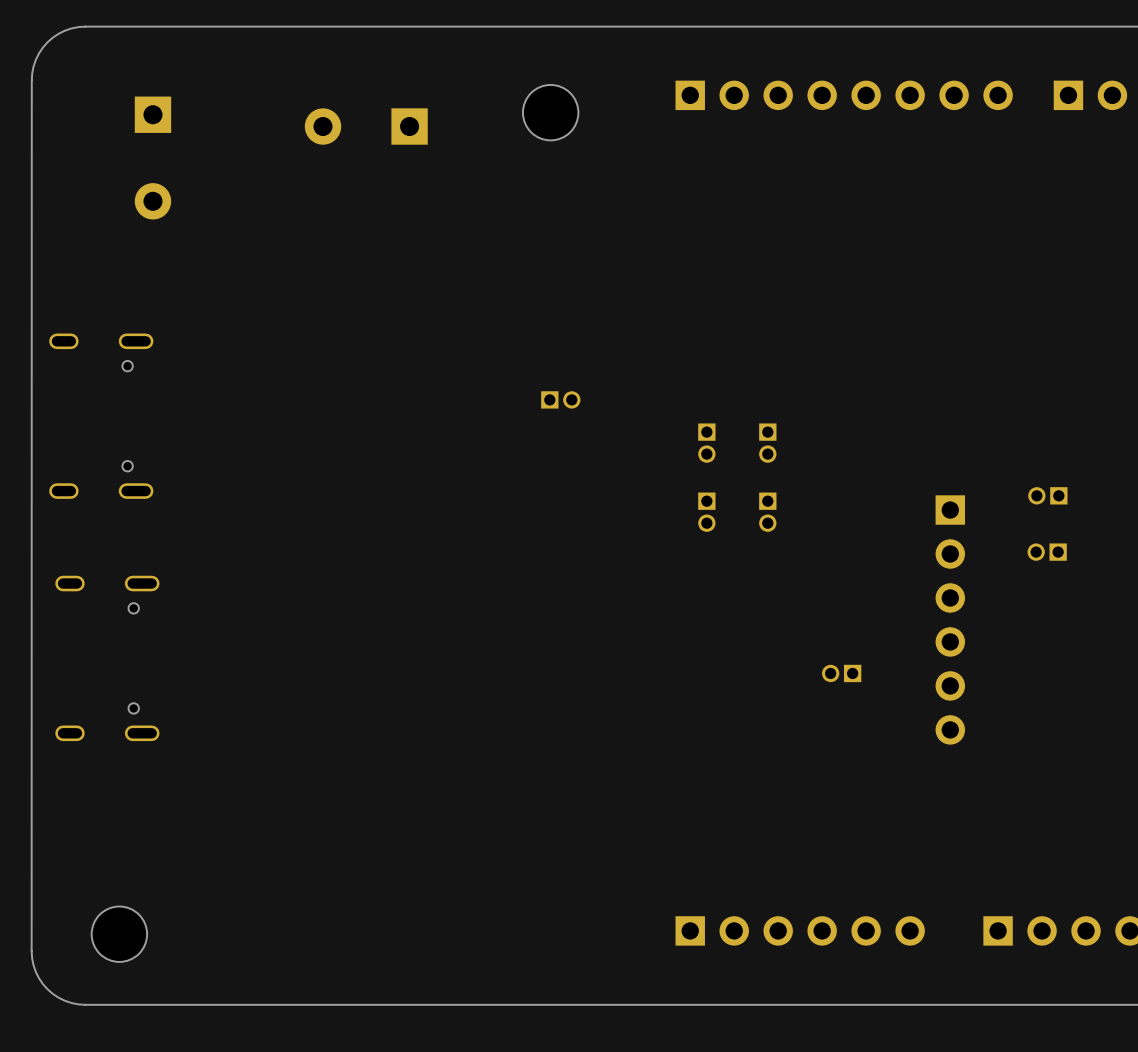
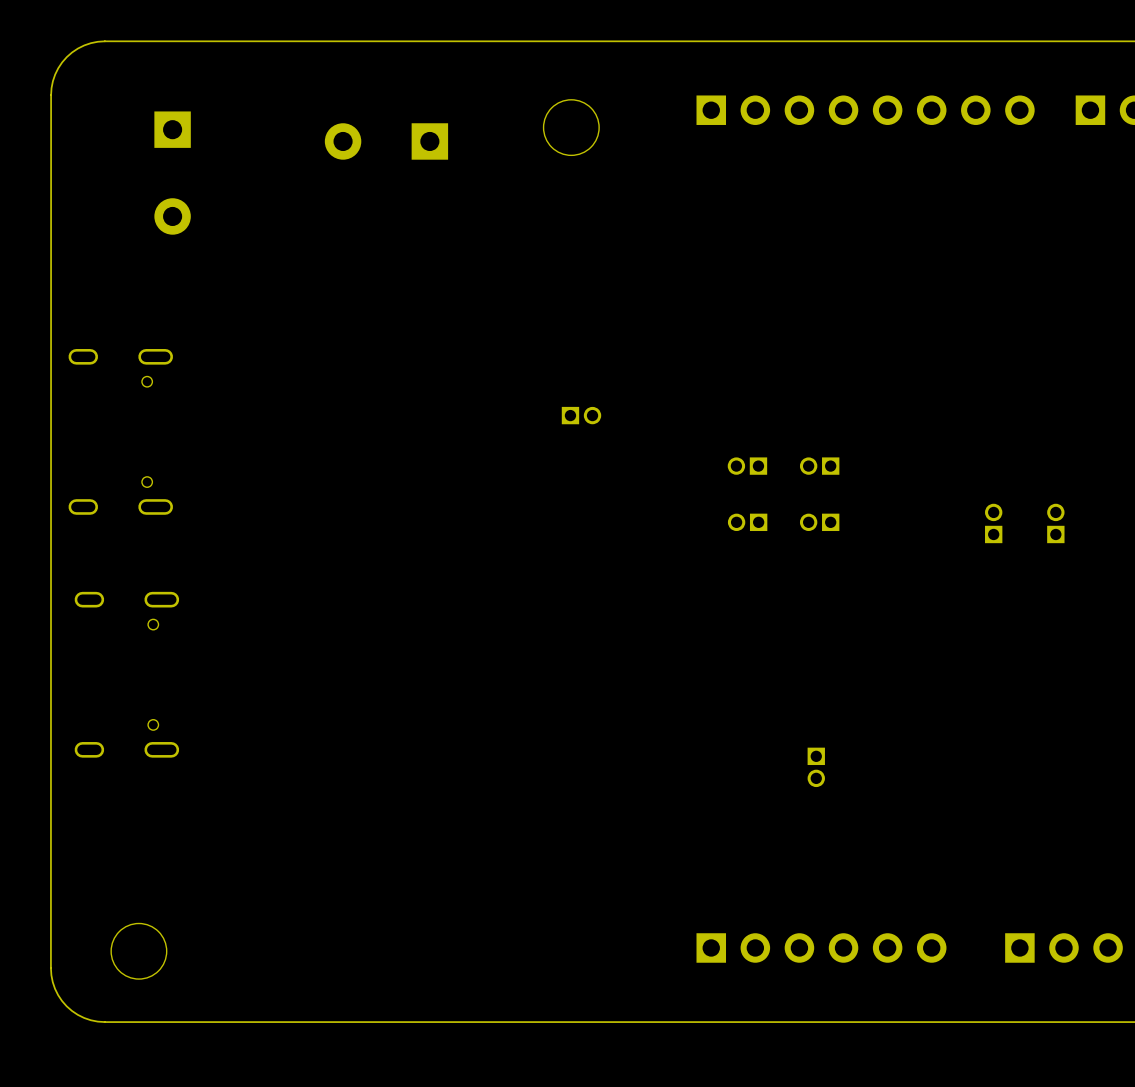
part rotation: 0° (706, 443) -> 90° clockwise (747, 466)
part: (767, 443) -> none
part: none -> (819, 466)
part rotation: 0° (1047, 495) -> 90° clockwise (1055, 523)
part: none -> (819, 522)
part: none -> (993, 523)
part rotation: 0° (706, 512) -> 90° clockwise (747, 522)
part: (767, 512) -> none
part: (1047, 552) -> none
part: (950, 619) -> none
part: (841, 673) -> none
part: none -> (816, 767)

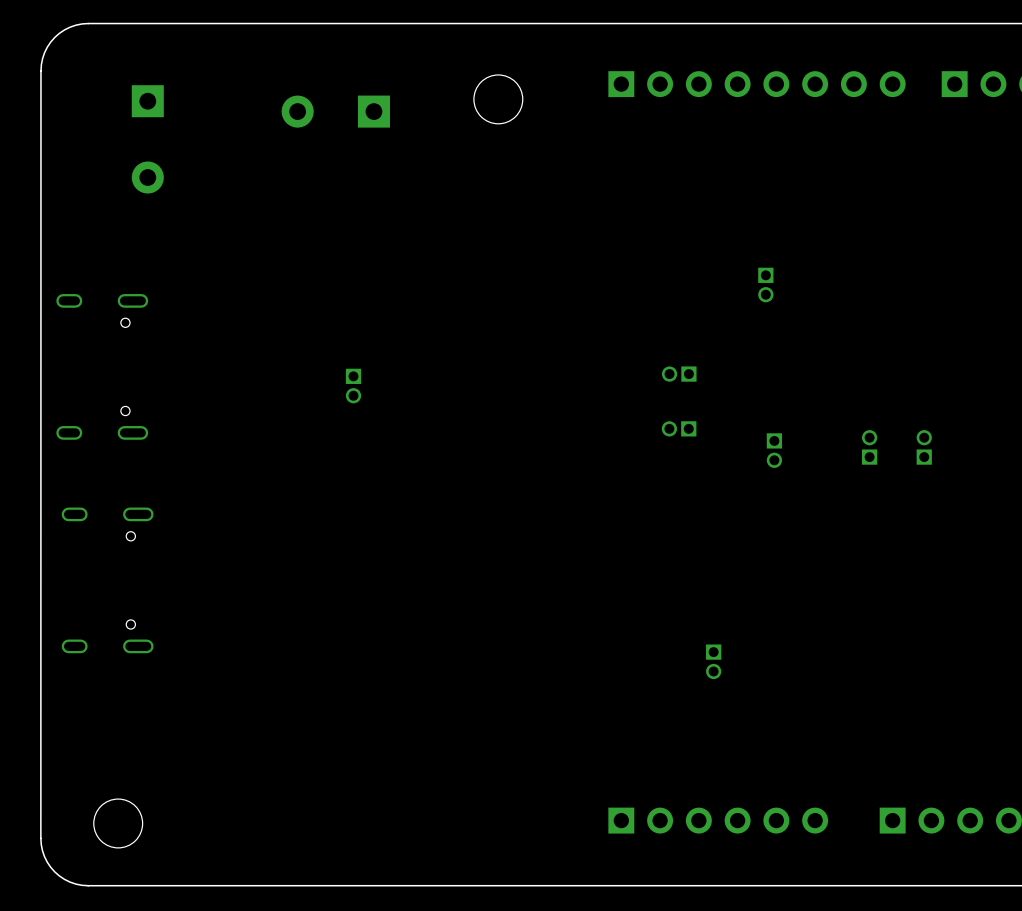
part: none -> (765, 285)
part: (581, 415) -> none
part: none -> (679, 374)
part: none -> (353, 386)
part: (747, 466) -> none
part: (819, 466) -> none
part: none -> (679, 428)
part: (747, 522) -> none
part: (819, 522) -> none
part: none -> (774, 450)

